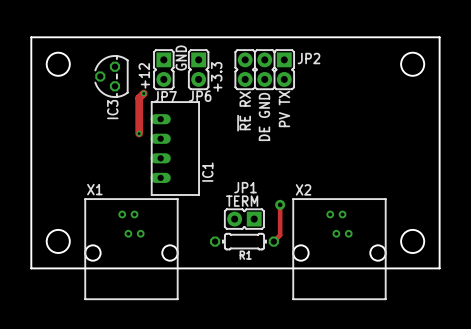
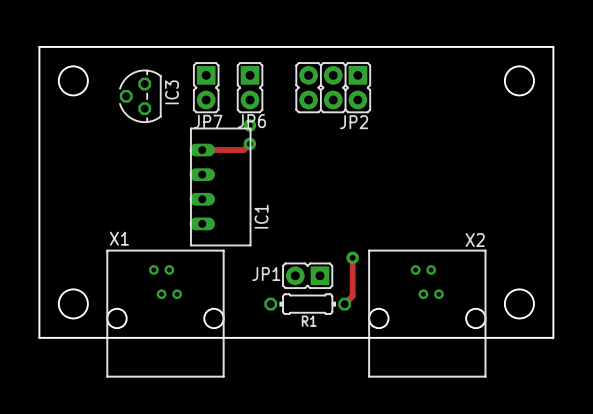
text: GND (181, 58) -> none
JP2 name position: JP2 (309, 58) -> JP2 (354, 122)
text: +12 (144, 75) -> none
text: +3.3 (216, 76) -> none
track: (143, 93) (139, 98) (139, 133) -> none
via: (143, 93) -> none
via: none -> (249, 125)
text: PV TX (284, 108) -> none
IC3 name position: IC3 (112, 109) -> IC3 (172, 92)
text: ~{RE} RX (244, 111) -> none
track: none -> (249, 143) (243, 150) (202, 150)
via: none -> (249, 143)
text: DE GND (264, 116) -> none
via: (139, 133) -> none
JP1 name position: JP1 (245, 187) -> JP1 (266, 274)
X2 name position: X2 (303, 189) -> X2 (475, 240)
text: TERM (242, 201) -> none

